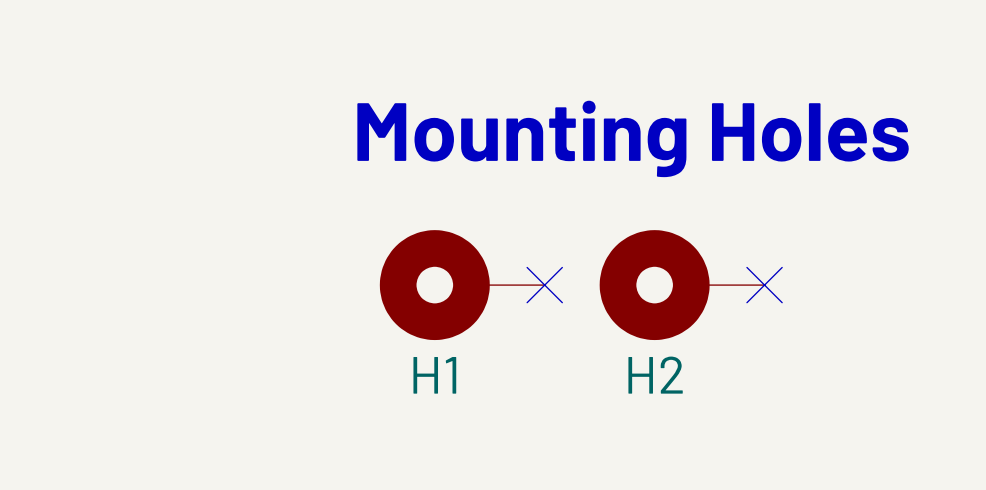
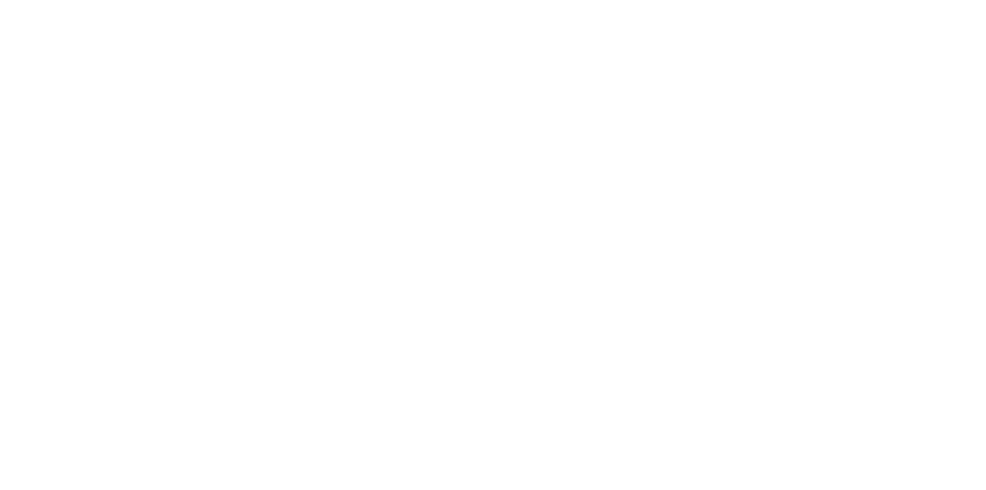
text: Mounting Holes (633, 138) -> none
H1: (462, 285) -> none
no-connect mark: (544, 285) -> none
H2: (682, 285) -> none
no-connect mark: (764, 285) -> none

